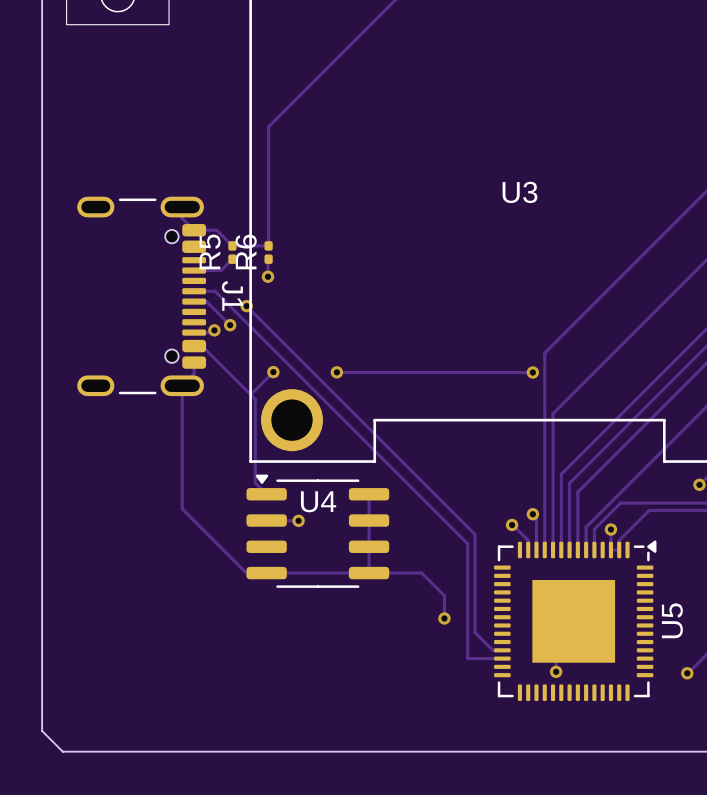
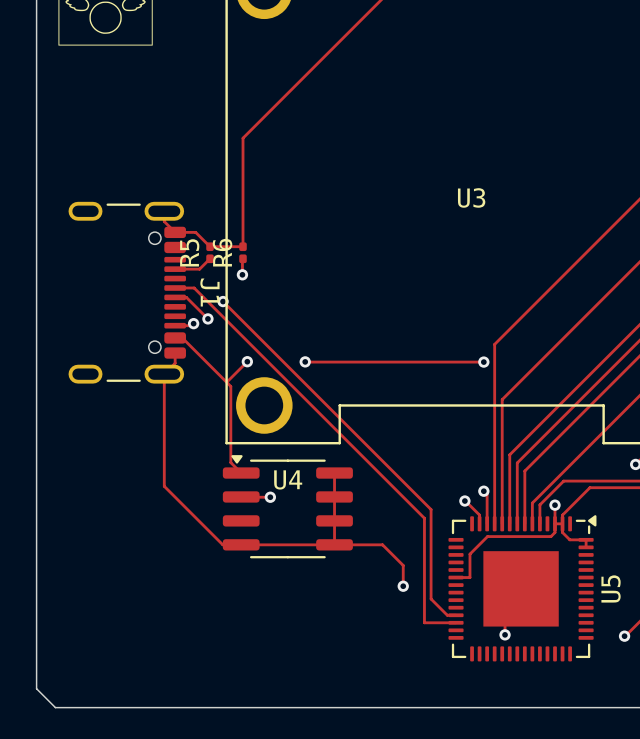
track: none -> (554, 523) (554, 532) (550, 536) (487, 536) (469, 554) (469, 577) (456, 577)
track: none -> (562, 523) (562, 532) (569, 539) (586, 539) (586, 547)

